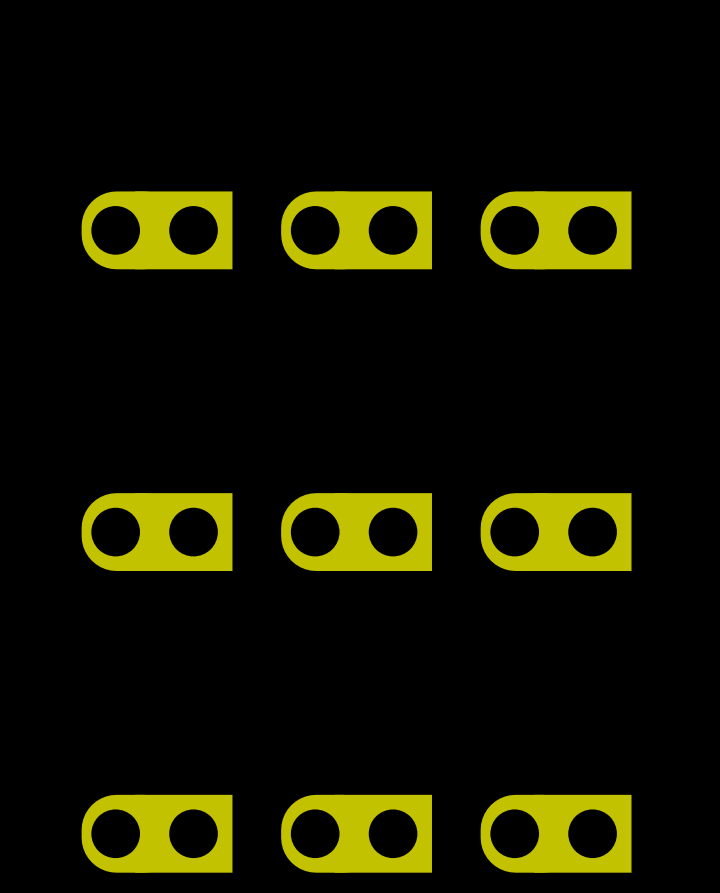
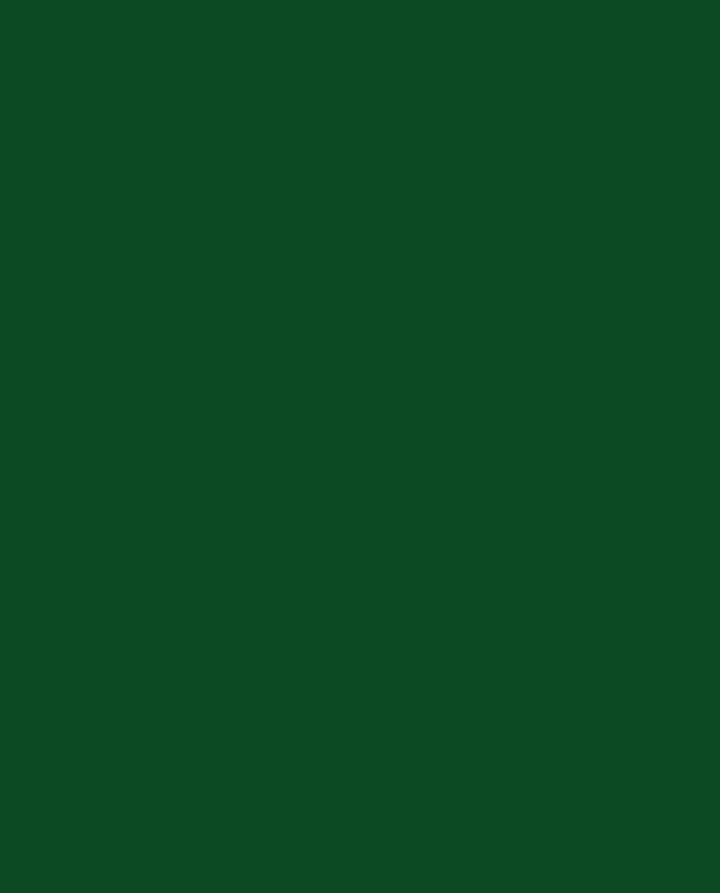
part: (157, 230) -> none
part: (356, 230) -> none
part: (556, 230) -> none
part: (157, 532) -> none
part: (356, 532) -> none
part: (556, 532) -> none
part: (157, 833) -> none
part: (356, 833) -> none
part: (556, 833) -> none

